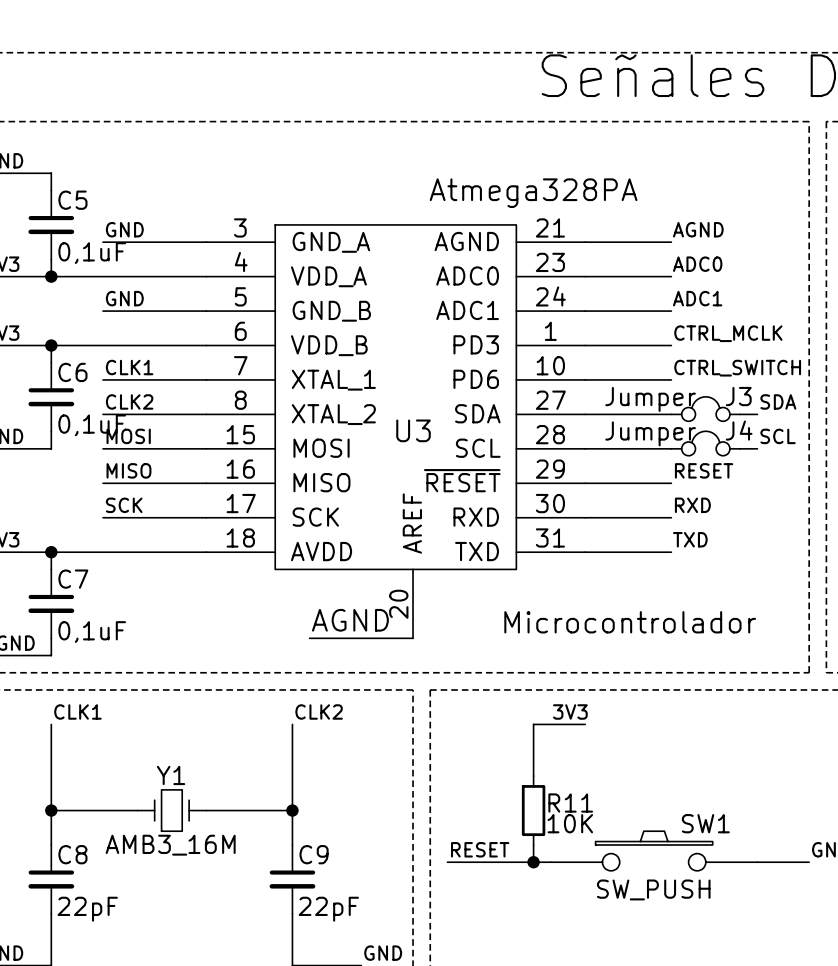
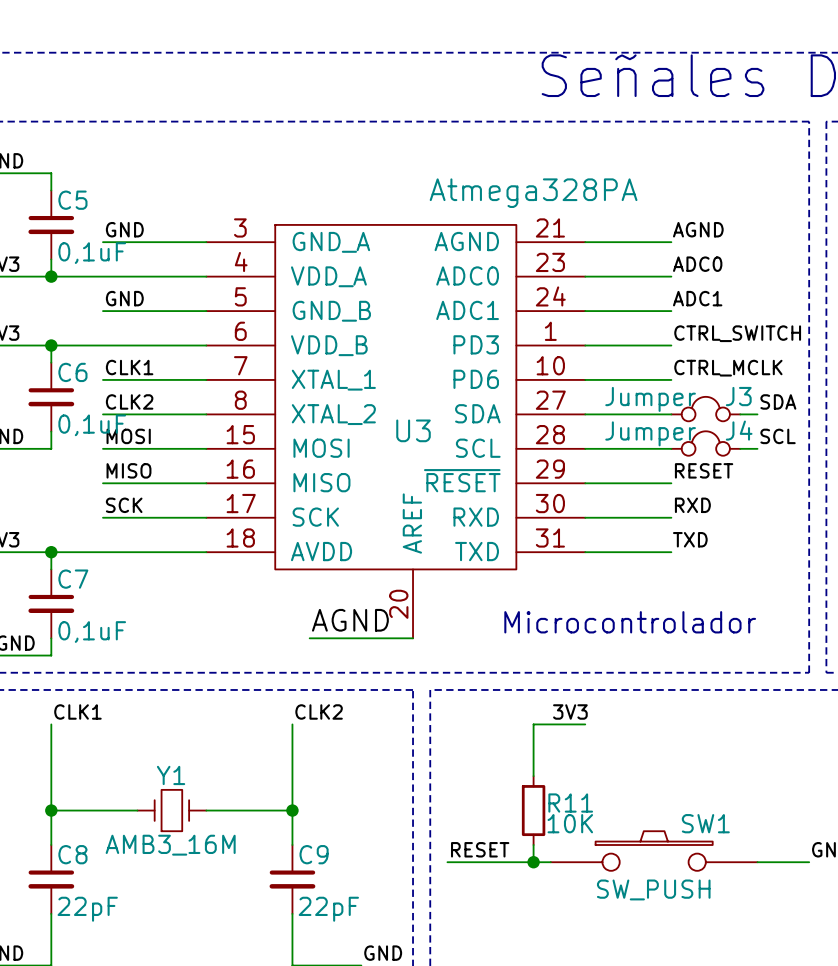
label: CTRL_MCLK (728, 333) -> CTRL_SWITCH (737, 333)
label: CTRL_SWITCH (737, 368) -> CTRL_MCLK (728, 368)

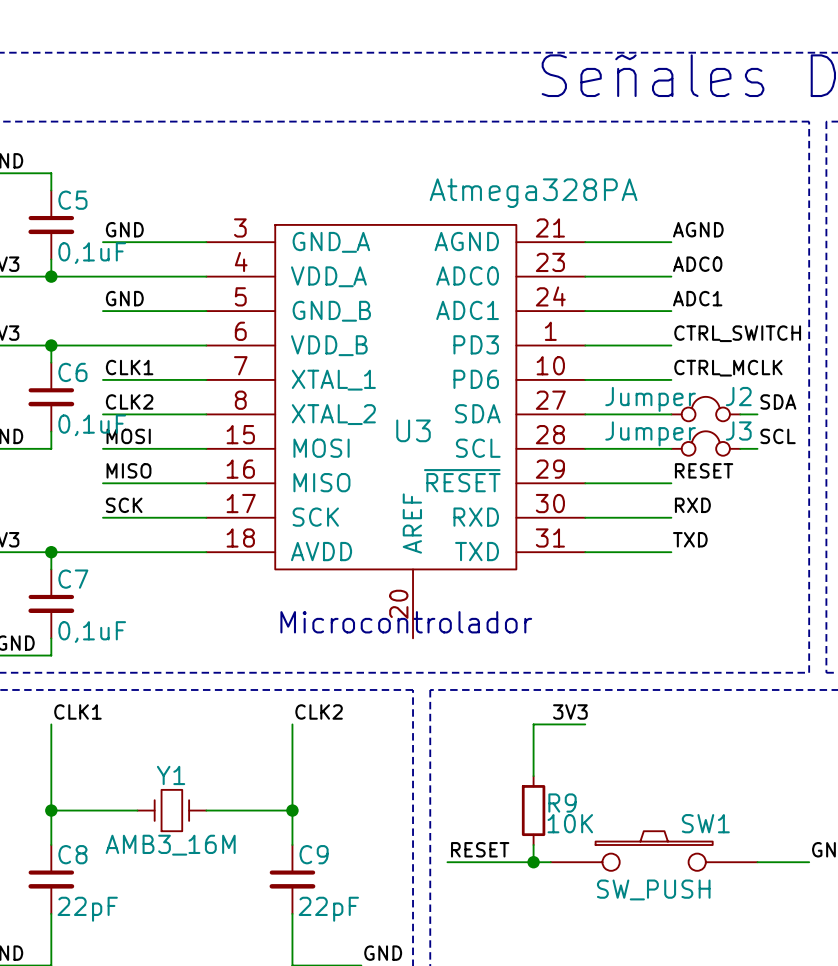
J3 name: J3 (738, 396) -> J2 (738, 396)
J4 name: J4 (739, 430) -> J3 (738, 430)
label: AGND (350, 620) -> none
text position: Microcontrolador (630, 622) -> Microcontrolador (406, 622)
wire: (309, 638) (413, 638) -> none
R11 name: R11 (570, 803) -> R9 (562, 803)

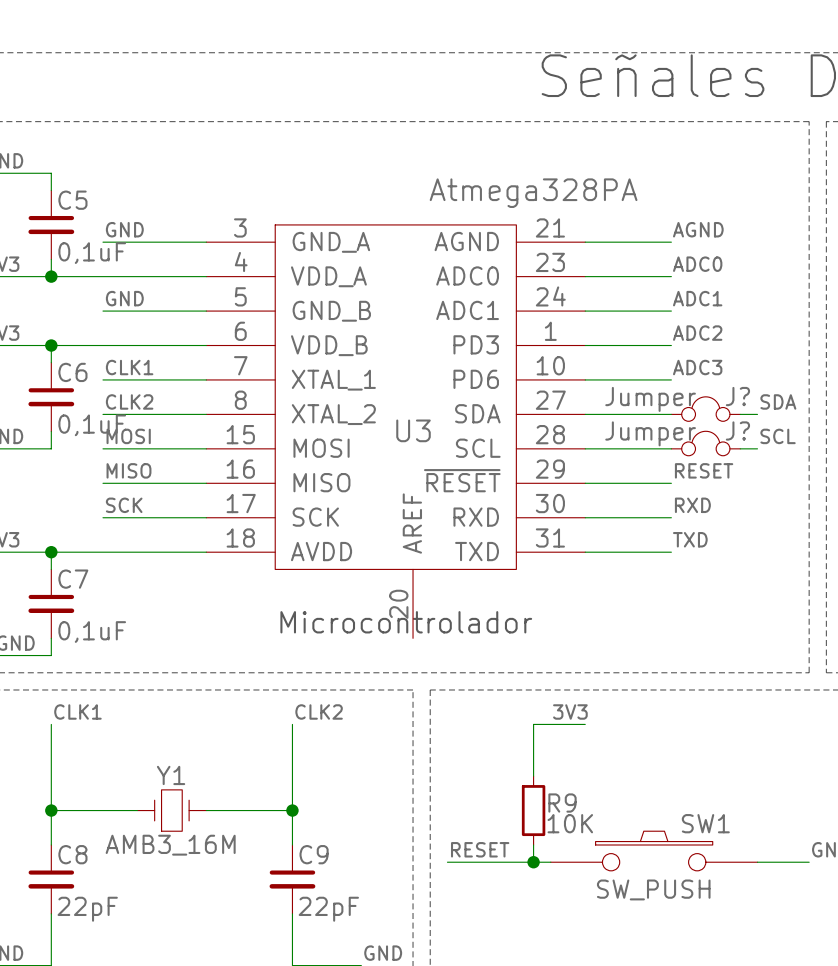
label: CTRL_SWITCH (737, 333) -> ADC2 (697, 333)
label: CTRL_MCLK (728, 368) -> ADC3 (697, 367)
J2 name: J2 (738, 396) -> J? (737, 396)
J3 name: J3 (738, 430) -> J? (737, 430)

